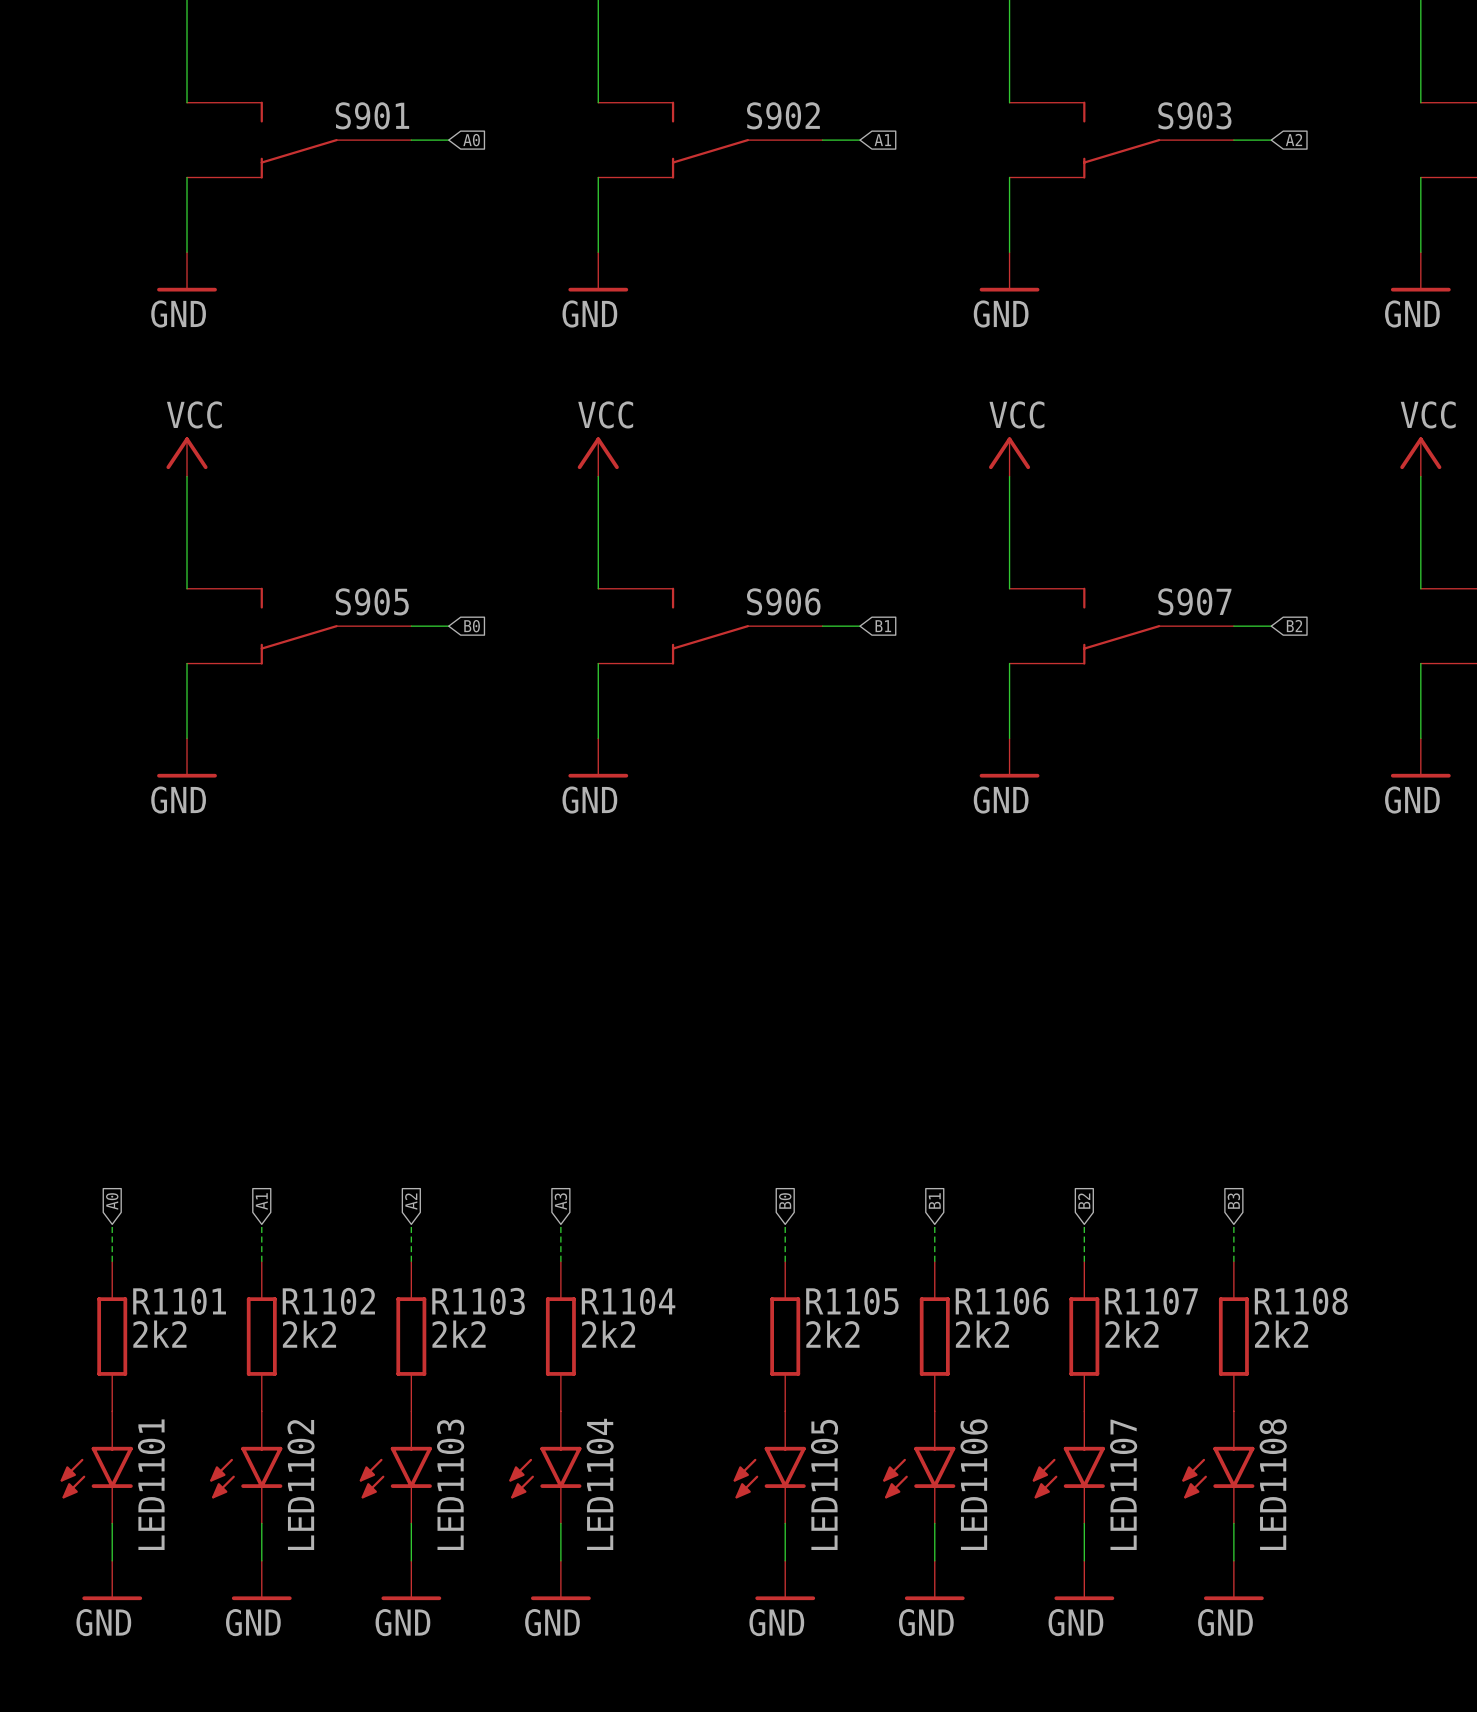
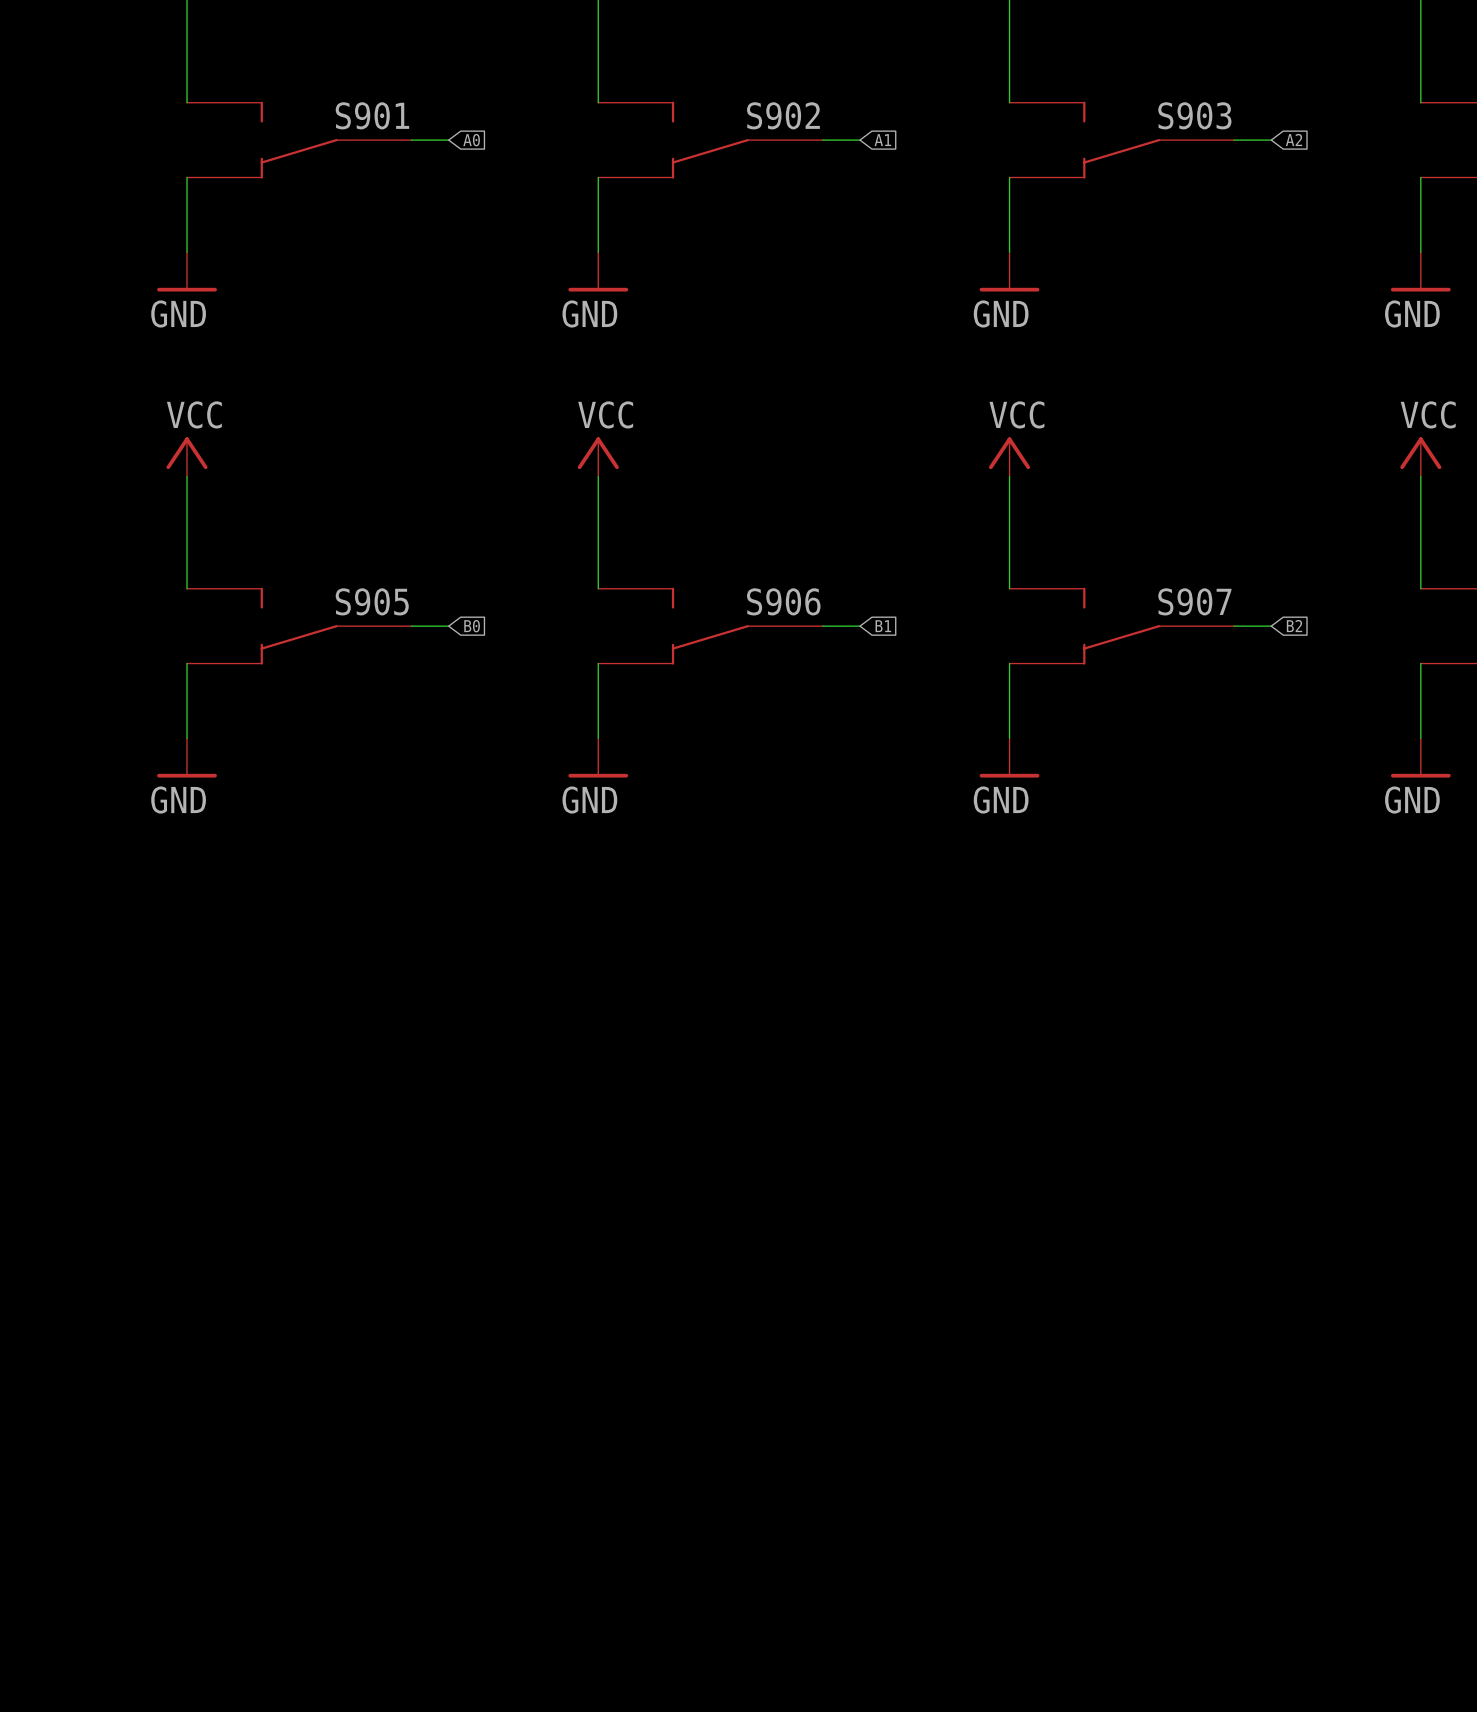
global label: A0 (112, 1201) -> none
global label: A1 (261, 1201) -> none
global label: A2 (411, 1201) -> none
global label: A3 (560, 1201) -> none
global label: B0 (785, 1201) -> none
global label: B1 (934, 1201) -> none
global label: B2 (1084, 1201) -> none
global label: B3 (1233, 1201) -> none
wire: (112, 1224) (112, 1261) -> none
wire: (261, 1224) (261, 1261) -> none
wire: (411, 1224) (411, 1261) -> none
wire: (560, 1224) (560, 1261) -> none
wire: (785, 1224) (785, 1261) -> none
wire: (934, 1224) (934, 1261) -> none
wire: (1084, 1224) (1084, 1261) -> none
wire: (1233, 1224) (1233, 1261) -> none
R1101: 2k2 (112, 1336) -> none
R1102: 2k2 (261, 1336) -> none
R1103: 2k2 (411, 1336) -> none
R1104: 2k2 (560, 1336) -> none
R1105: 2k2 (785, 1336) -> none
R1106: 2k2 (934, 1336) -> none
R1107: 2k2 (1084, 1336) -> none
R1108: 2k2 (1233, 1336) -> none
LED1101: (96, 1467) -> none
LED1102: (246, 1467) -> none
LED1103: (395, 1467) -> none
LED1104: (545, 1467) -> none
LED1105: (769, 1467) -> none
LED1106: (919, 1467) -> none
LED1107: (1068, 1467) -> none
LED1108: (1218, 1467) -> none
wire: (112, 1523) (112, 1560) -> none
wire: (261, 1523) (261, 1560) -> none
wire: (411, 1523) (411, 1560) -> none
wire: (560, 1523) (560, 1560) -> none
wire: (785, 1523) (785, 1560) -> none
wire: (934, 1523) (934, 1560) -> none
wire: (1084, 1523) (1084, 1560) -> none
wire: (1233, 1523) (1233, 1560) -> none
power symbol: GND (112, 1580) -> none
power symbol: GND (261, 1580) -> none
power symbol: GND (411, 1580) -> none
power symbol: GND (560, 1580) -> none
power symbol: GND (785, 1580) -> none
power symbol: GND (934, 1580) -> none
power symbol: GND (1084, 1580) -> none
power symbol: GND (1233, 1580) -> none

